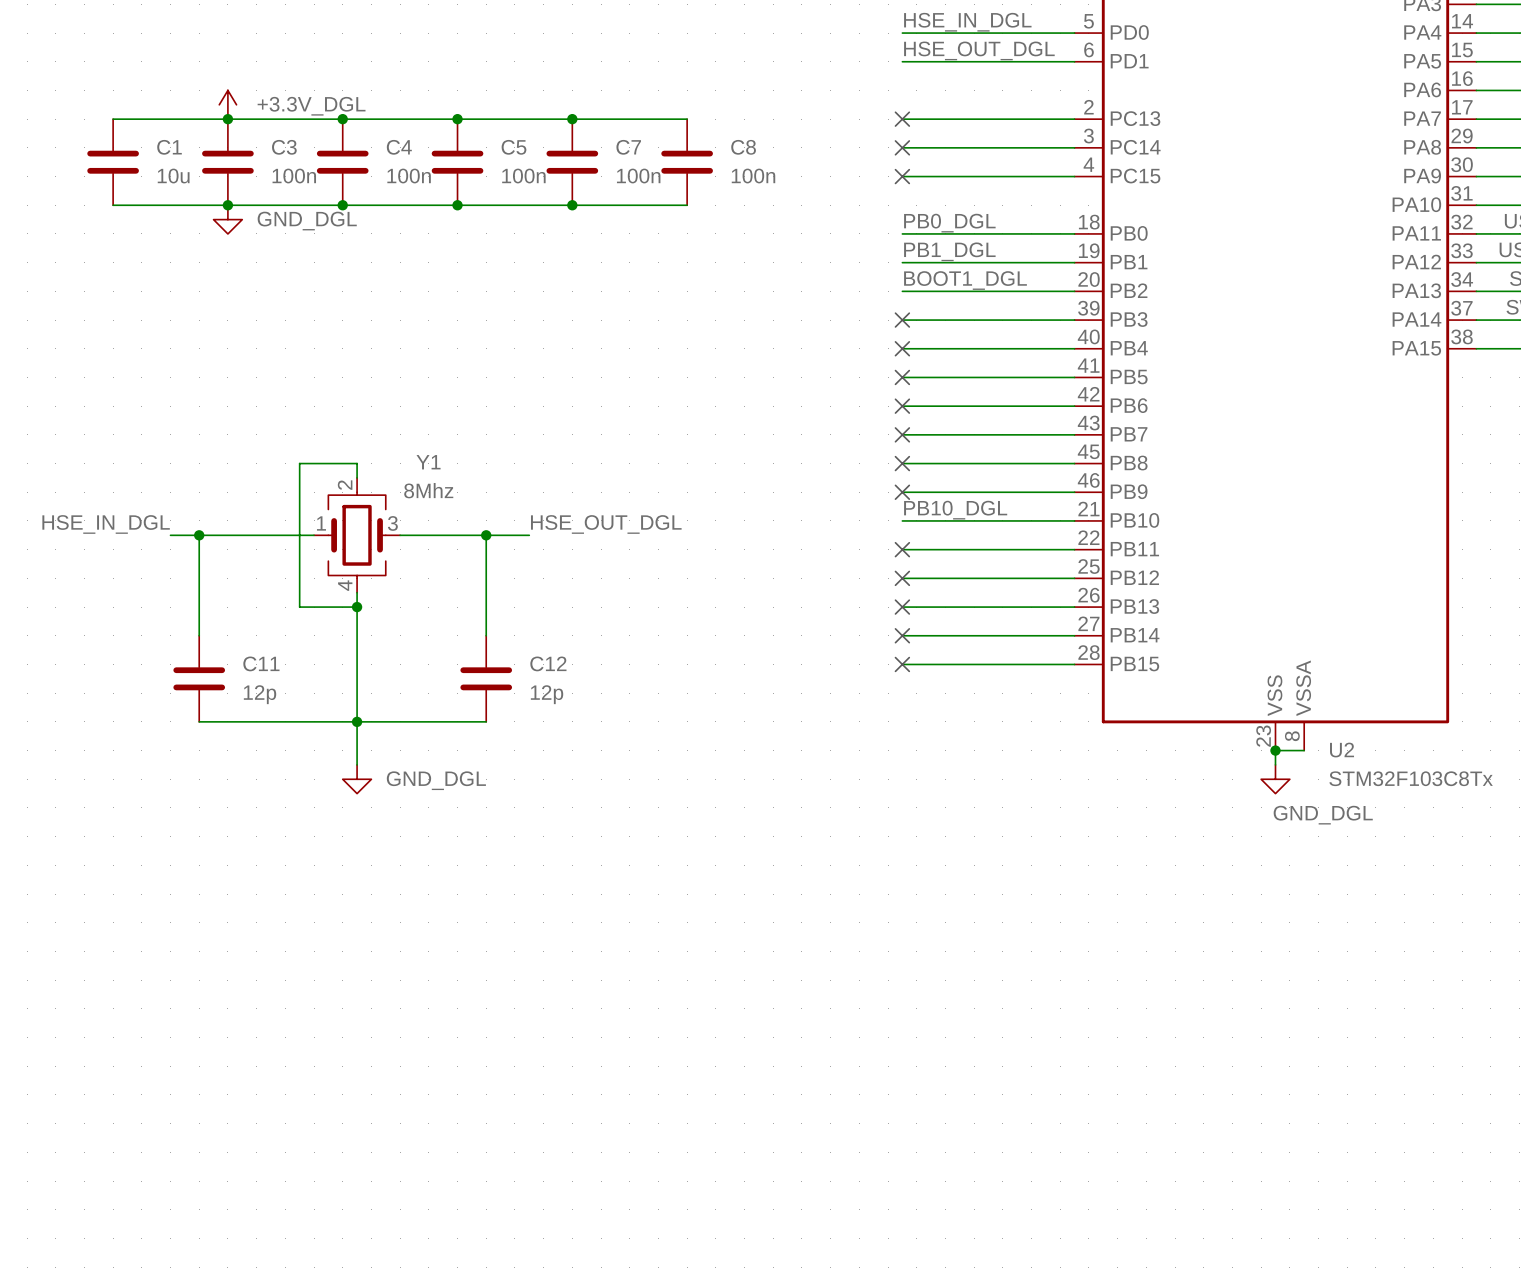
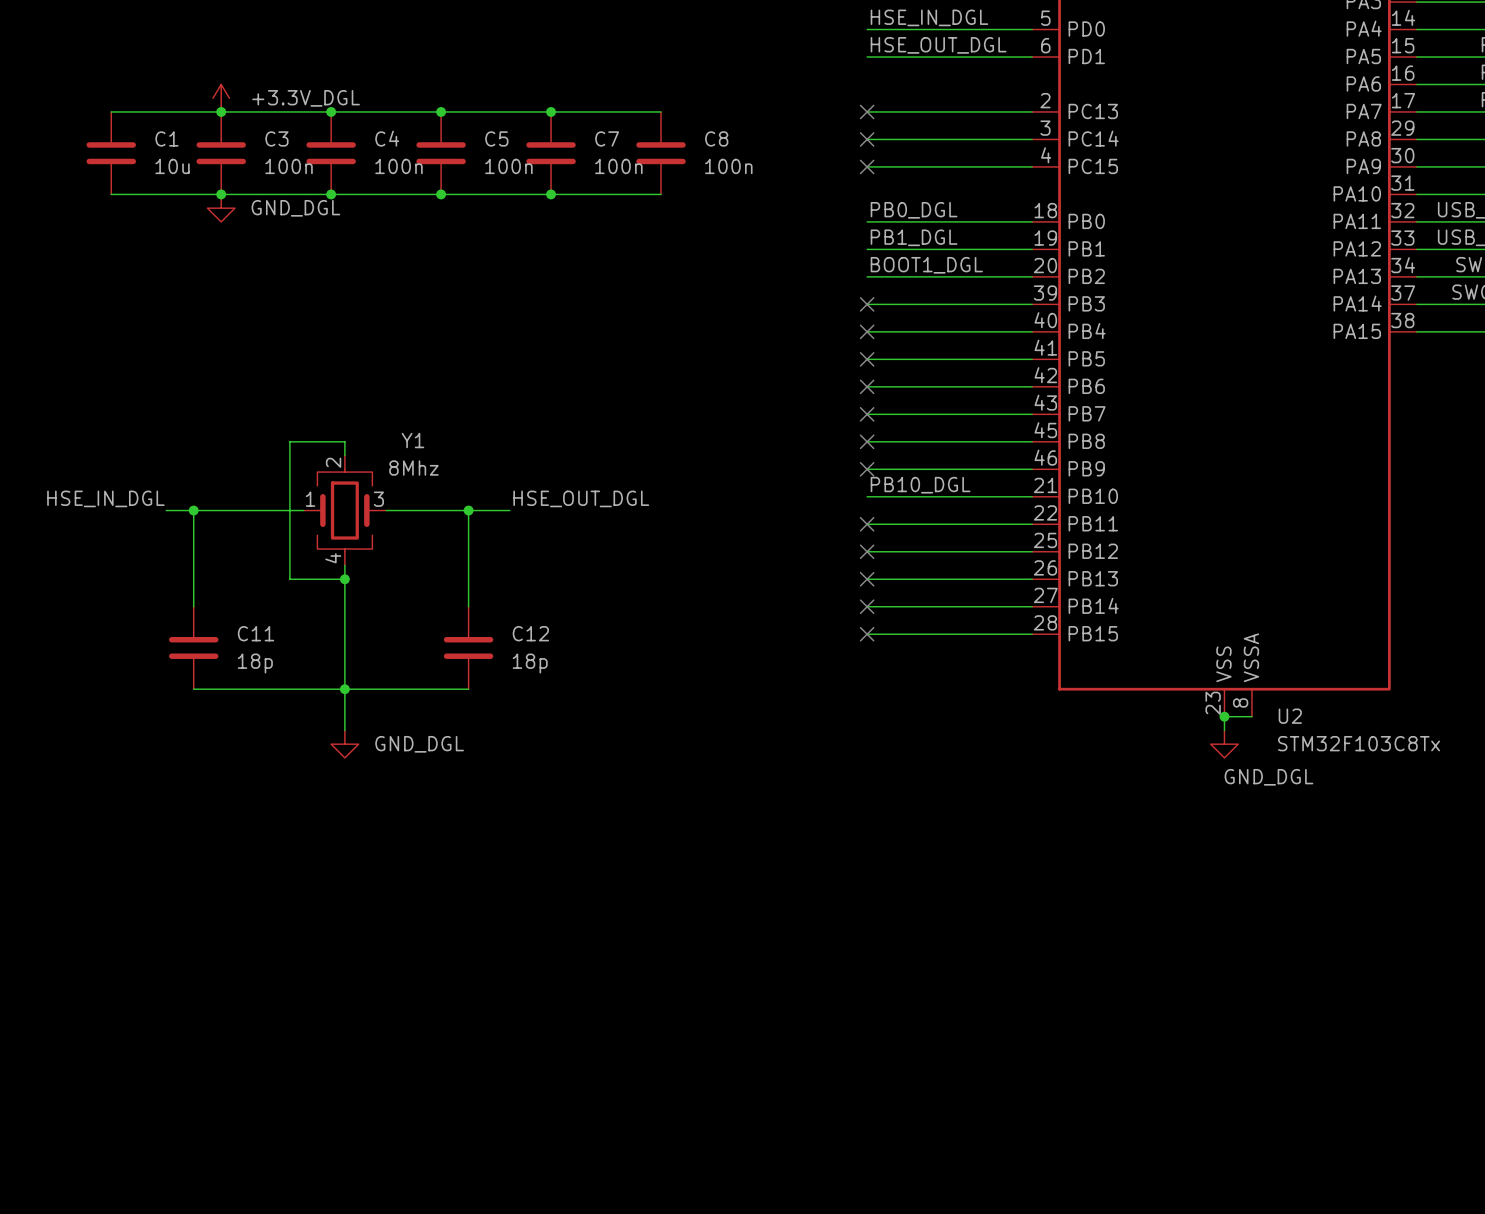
C11 value: 12p (260, 694) -> 18p (255, 663)
C12 value: 12p (547, 694) -> 18p (530, 663)

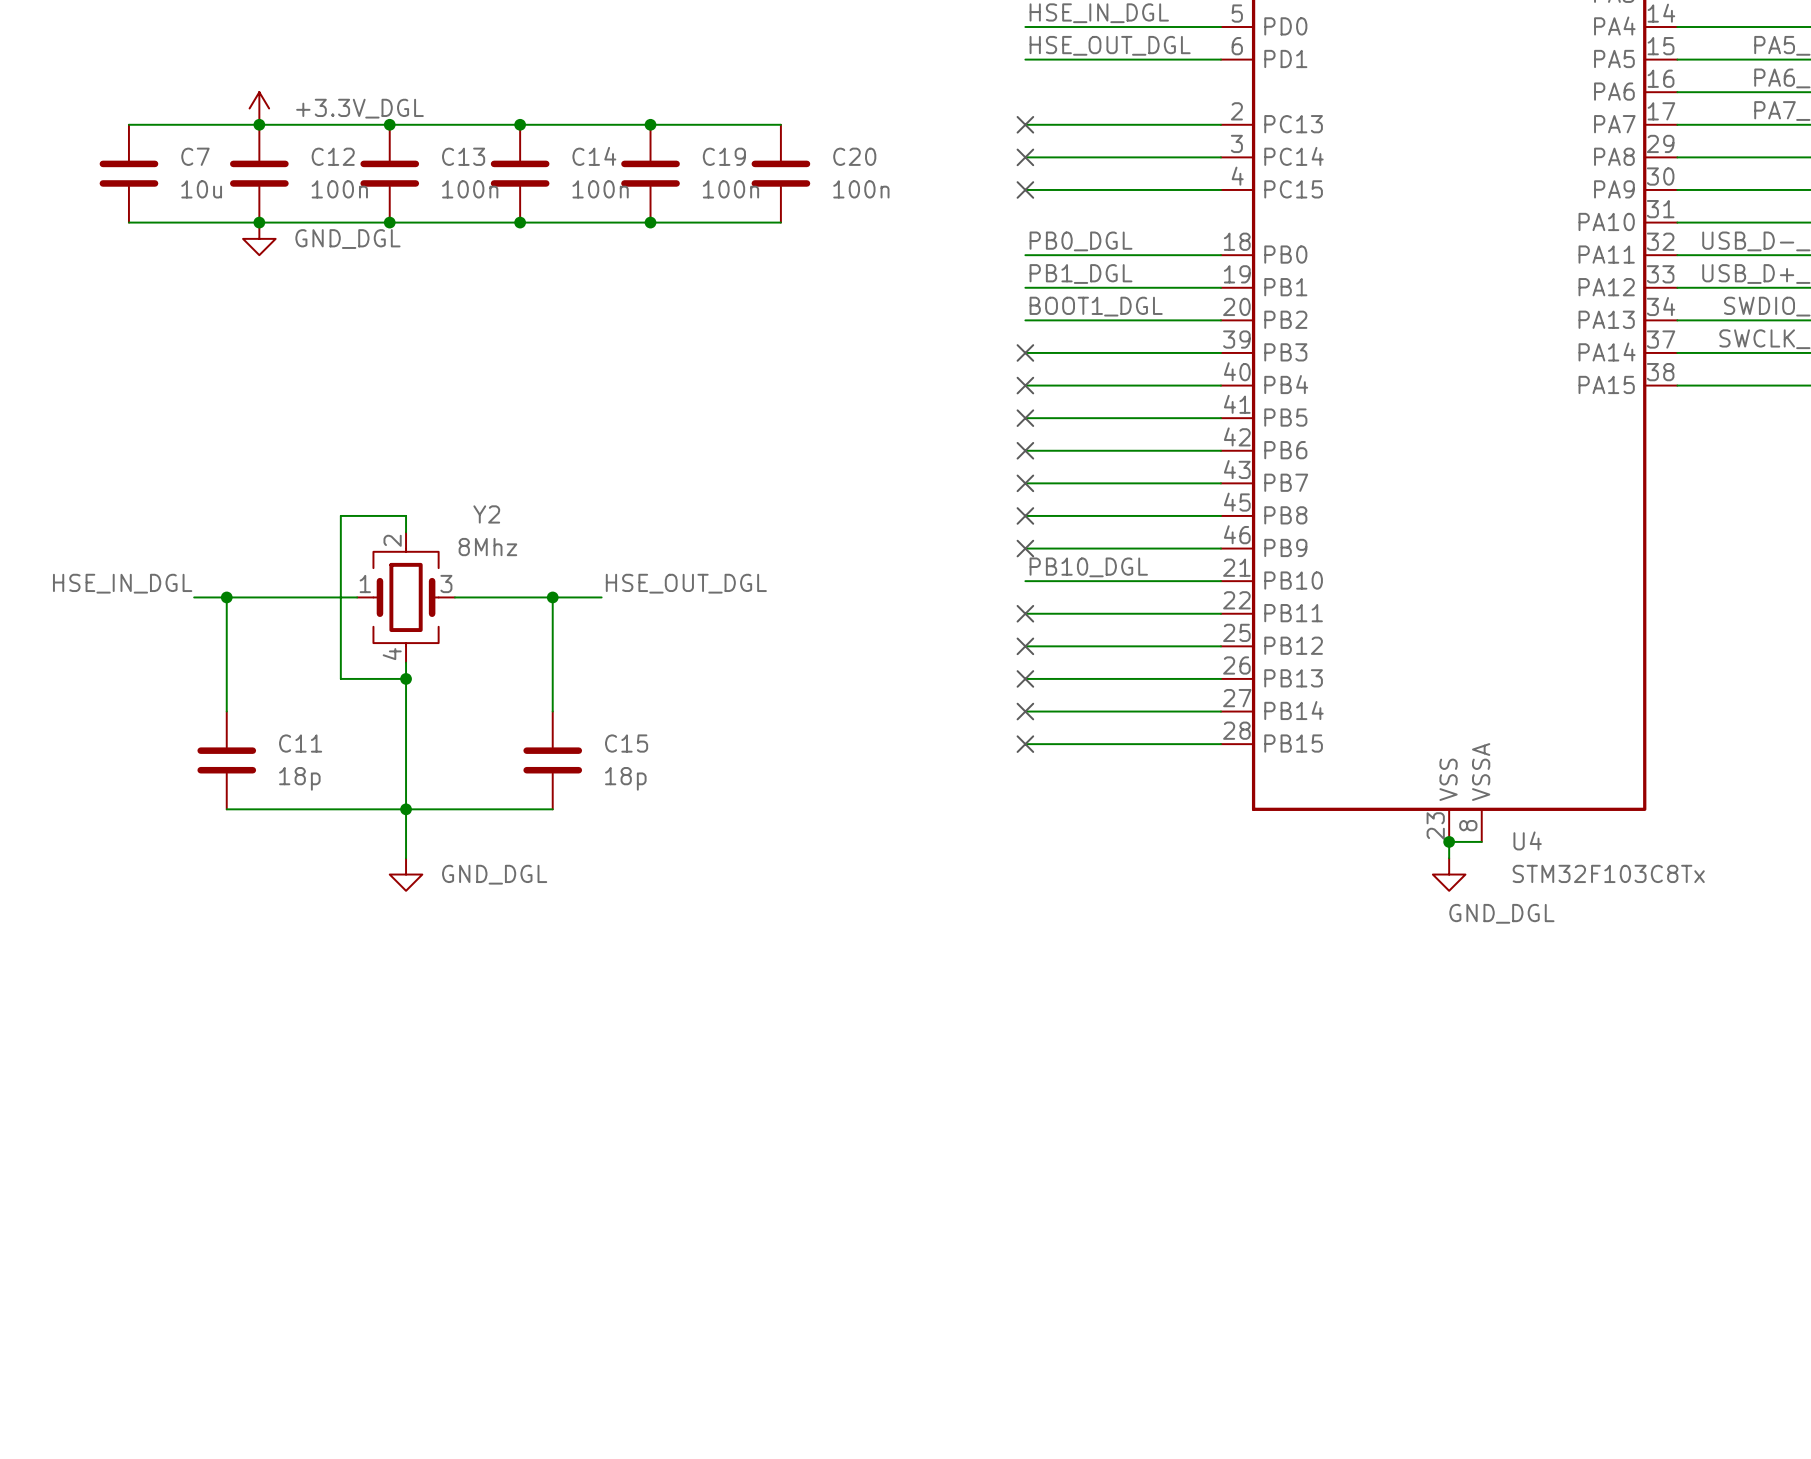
C1 name: C1 (166, 138) -> C7 (195, 156)
C3 name: C3 (276, 138) -> C12 (333, 156)
C4 name: C4 (387, 138) -> C13 (463, 156)
C5 name: C5 (496, 138) -> C14 (594, 156)
C7 name: C7 (607, 138) -> C19 (724, 156)
C8 name: C8 (716, 138) -> C20 (854, 156)
Y1 name: Y1 (412, 440) -> Y2 (486, 514)
C12 name: C12 (530, 633) -> C15 (626, 743)
U2 name: U2 (1290, 716) -> U4 (1527, 840)

